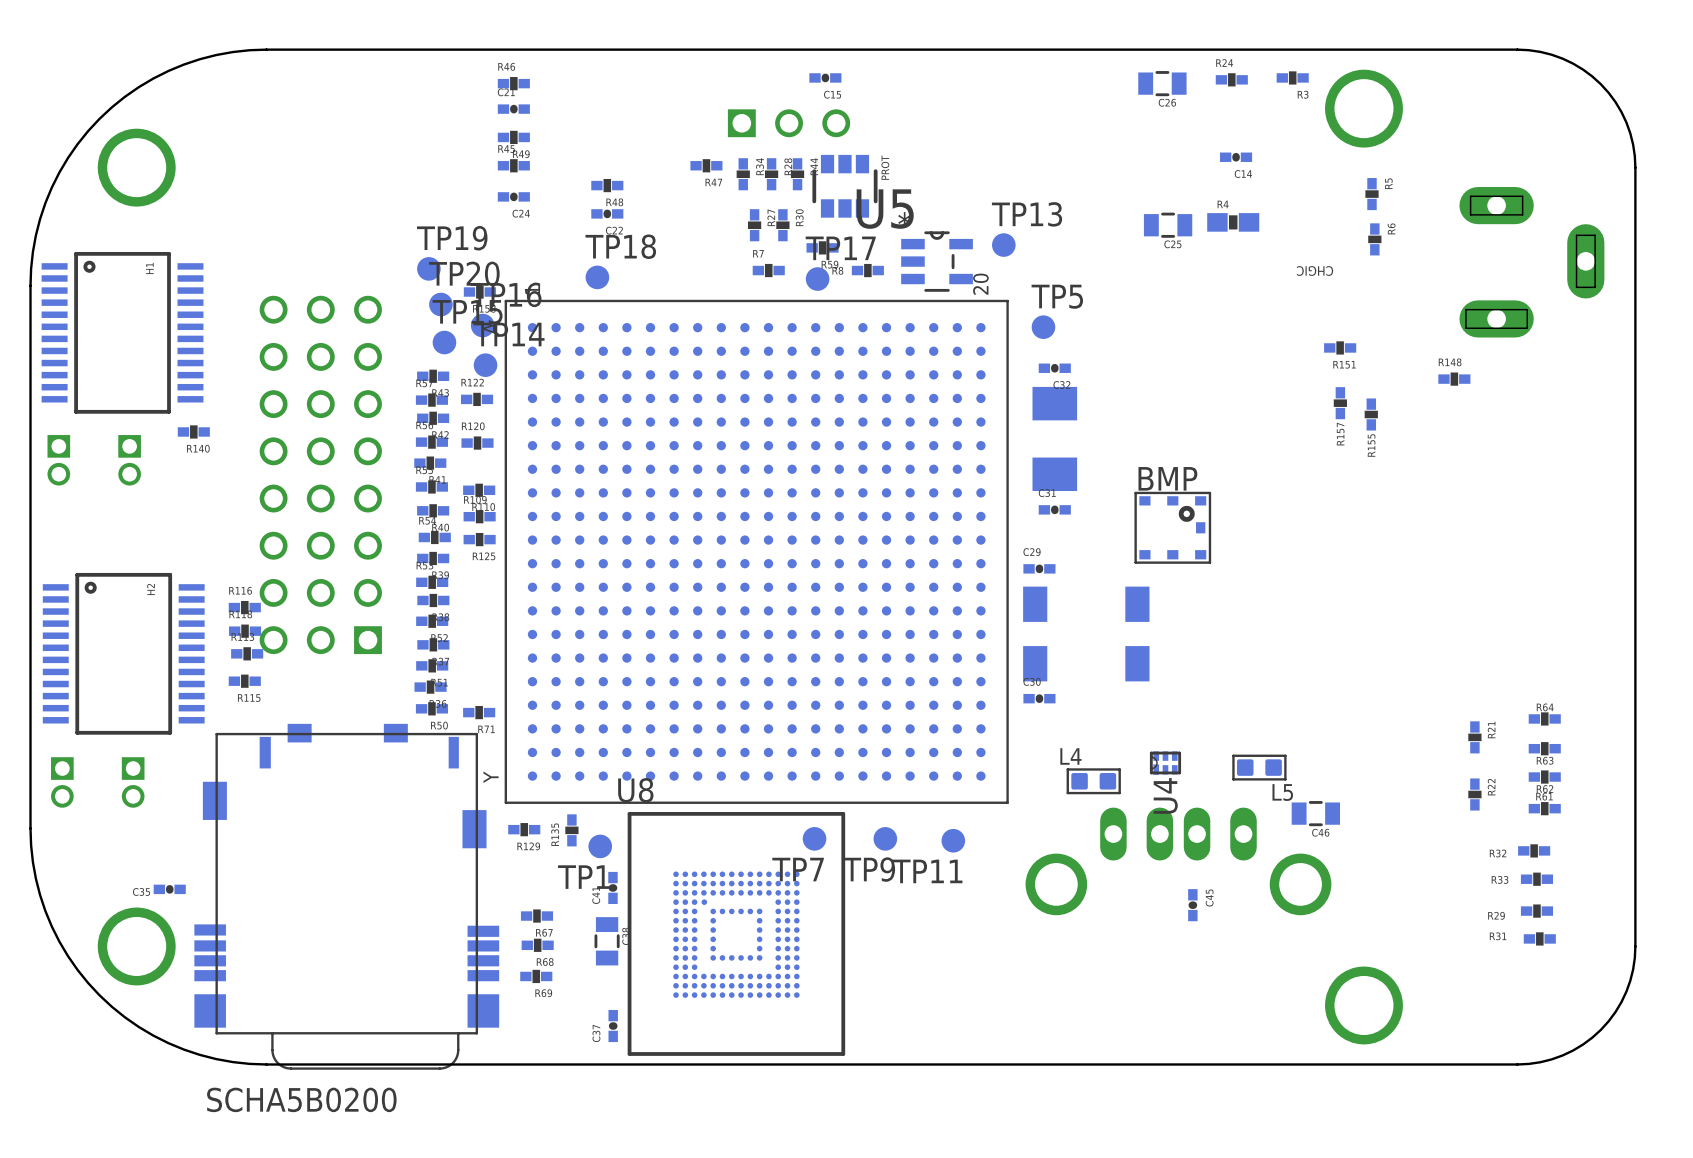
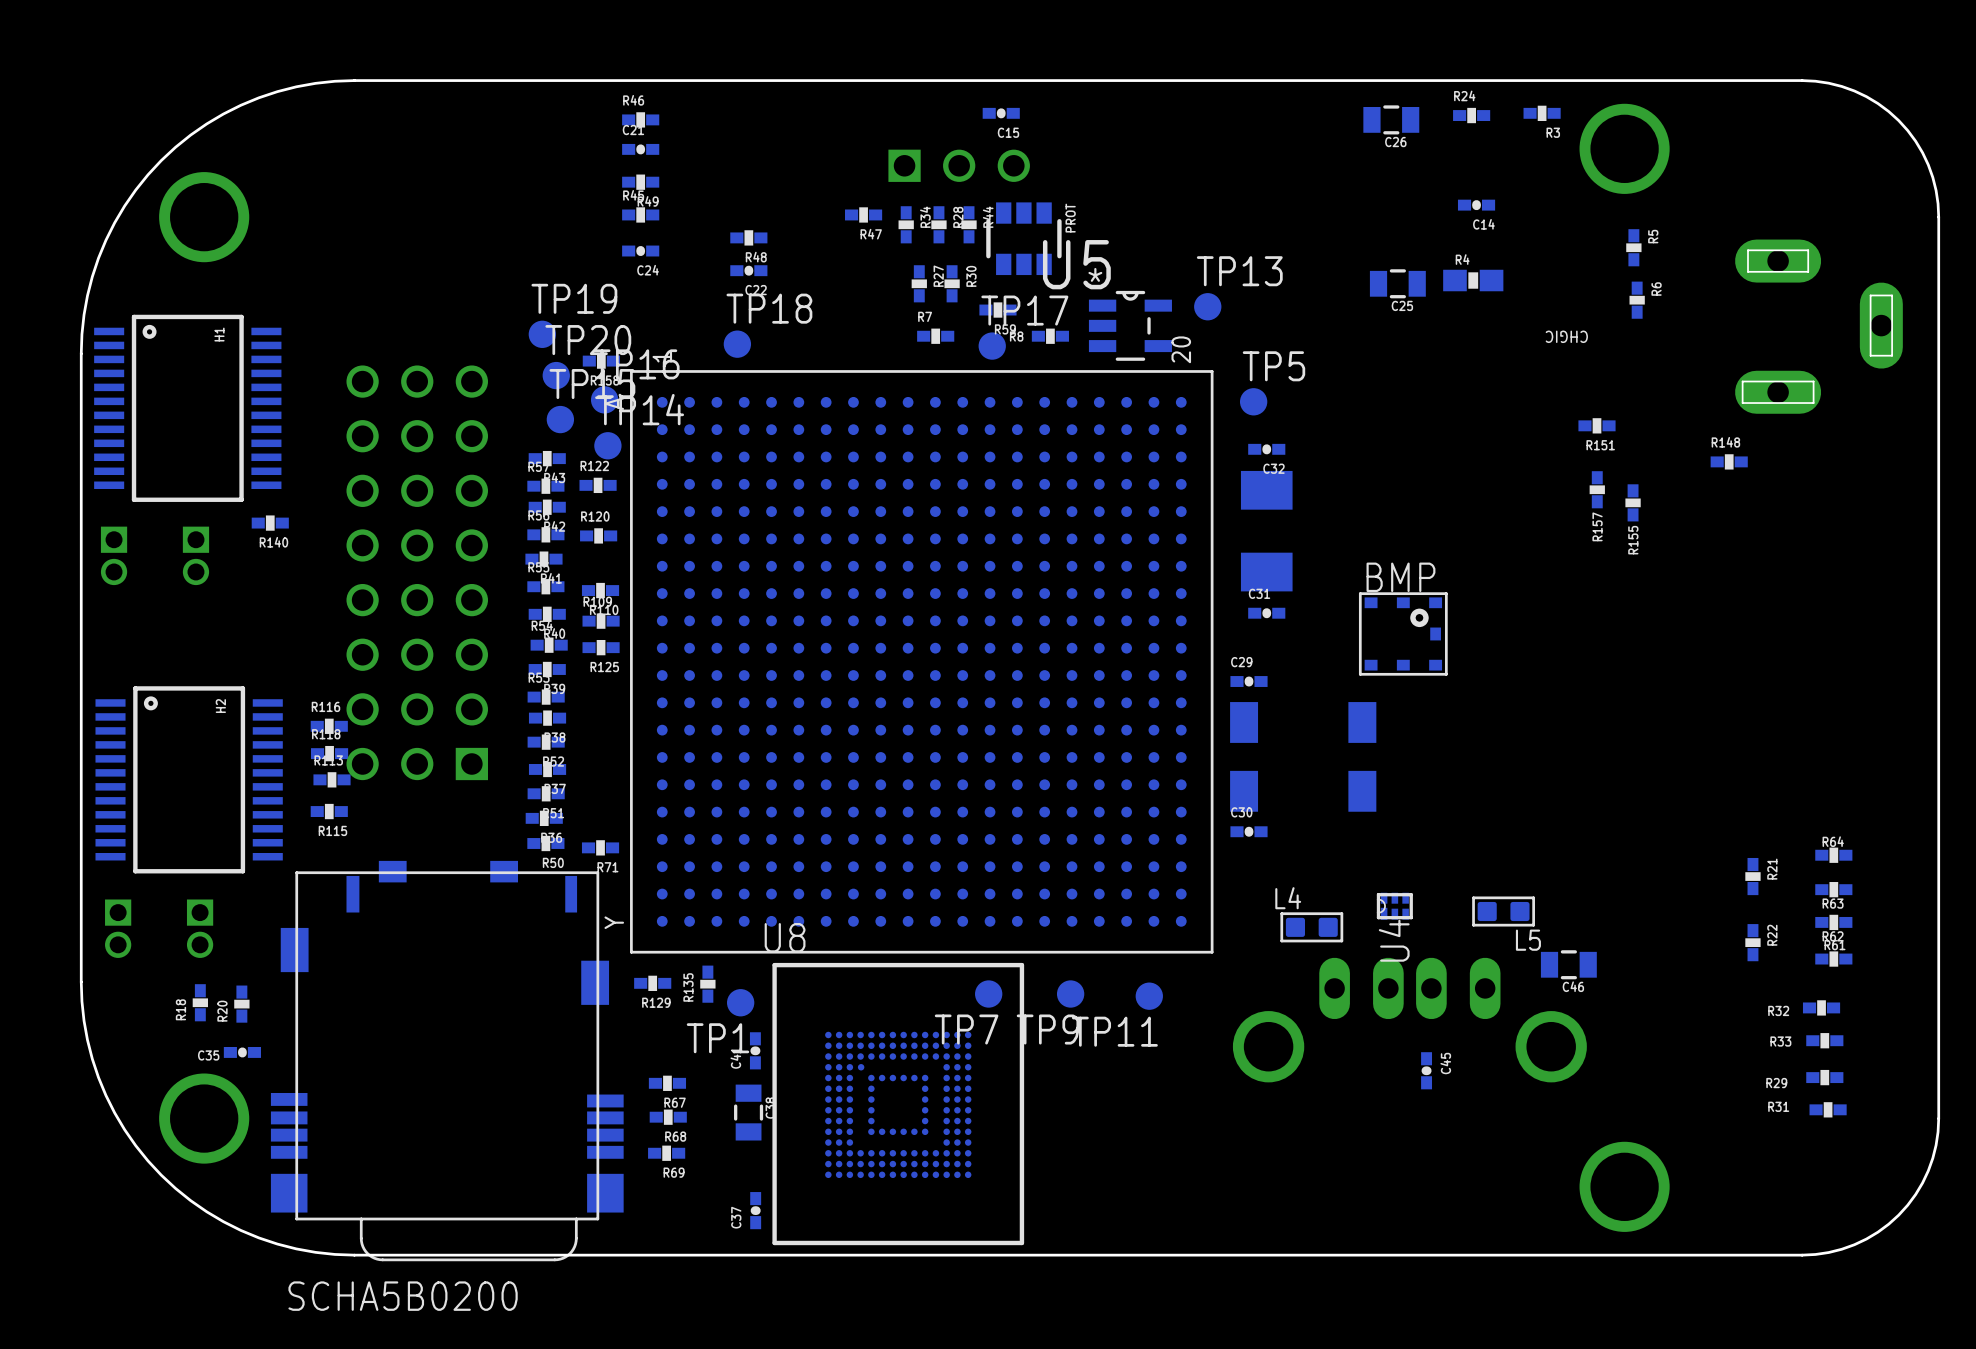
R18: none -> (200, 1002)
R20: none -> (241, 1004)

